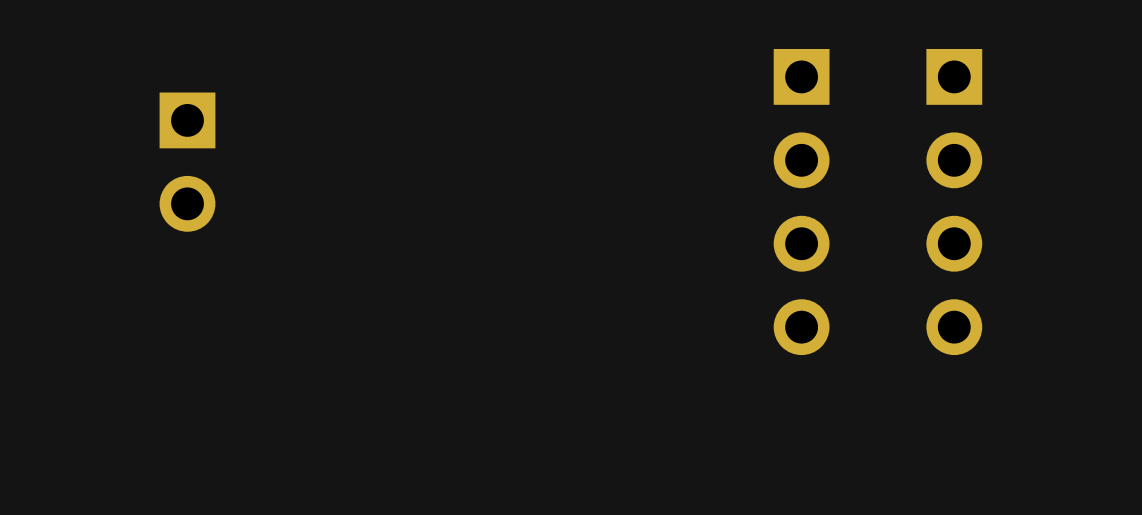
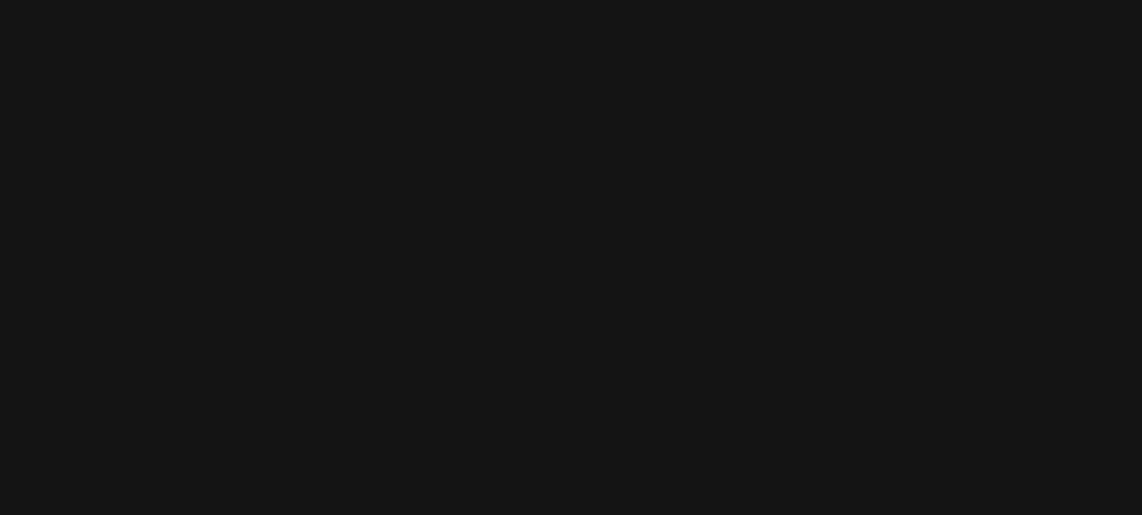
part: (187, 162) -> none
part: (801, 202) -> none
part: (954, 202) -> none

